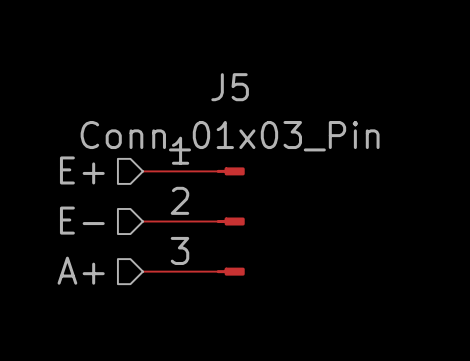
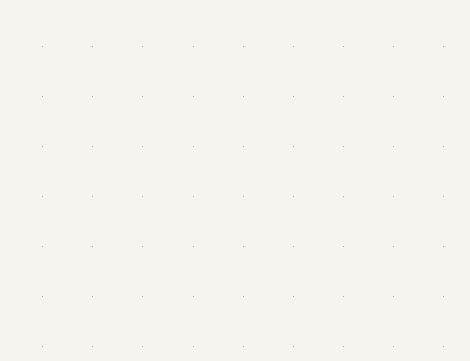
hierarchical label: E+ (82, 170) -> none
hierarchical label: E- (82, 220) -> none
J5: Conn_01x03_Pin (193, 221) -> none
hierarchical label: A+ (81, 270) -> none

